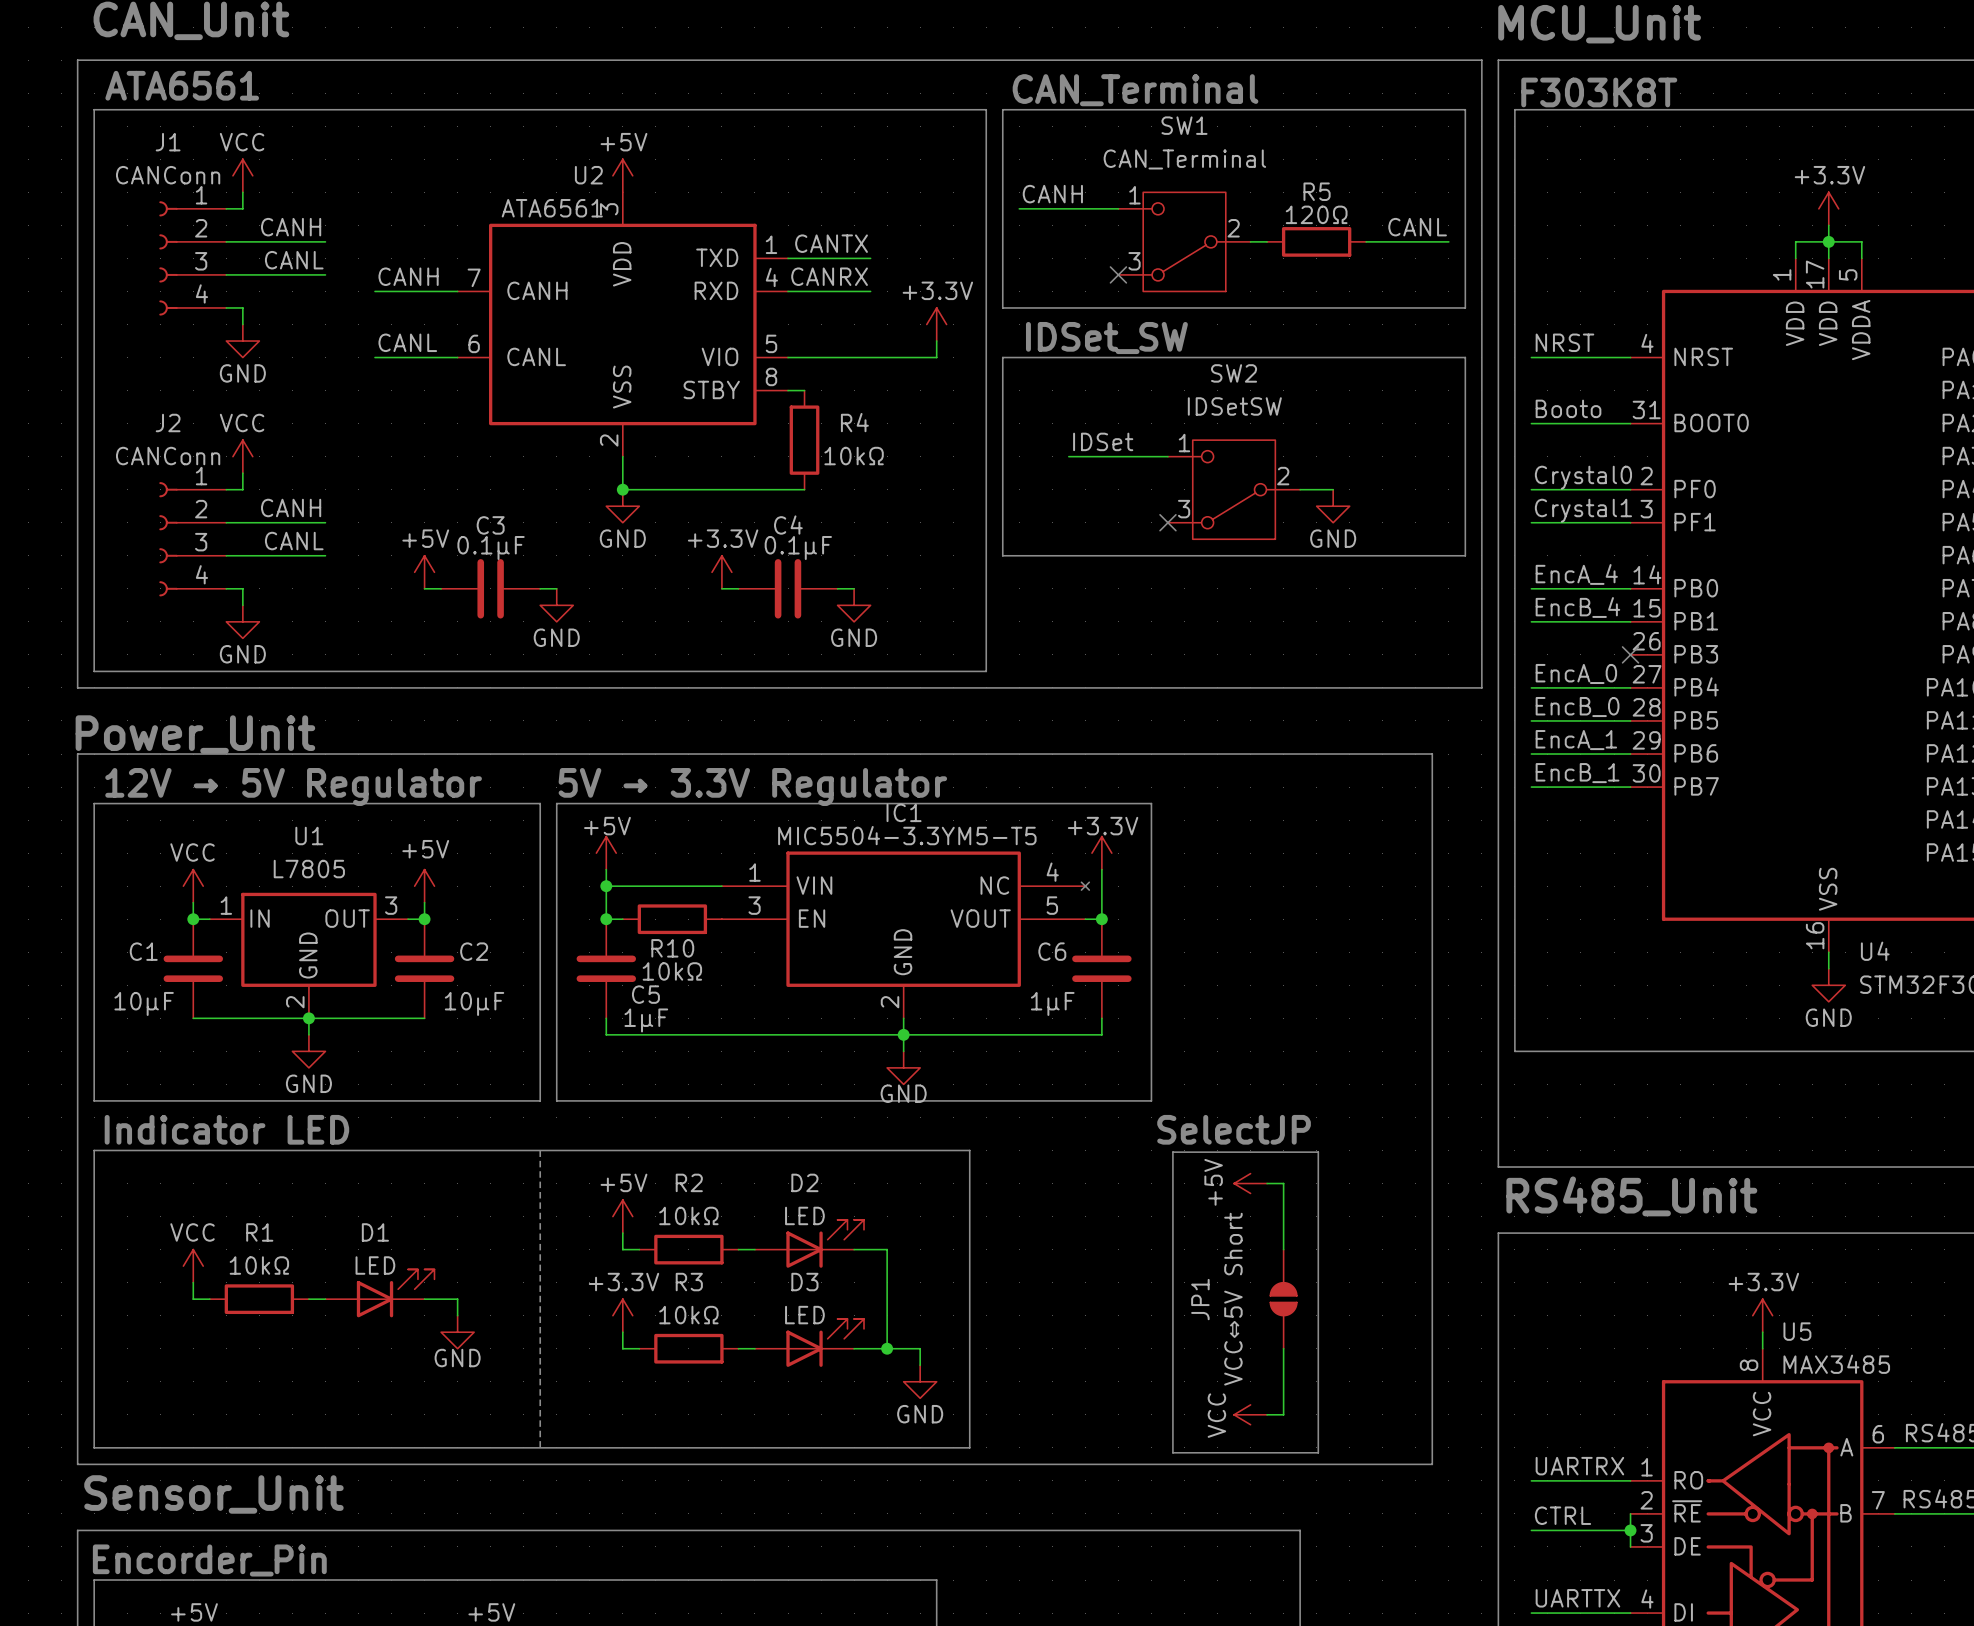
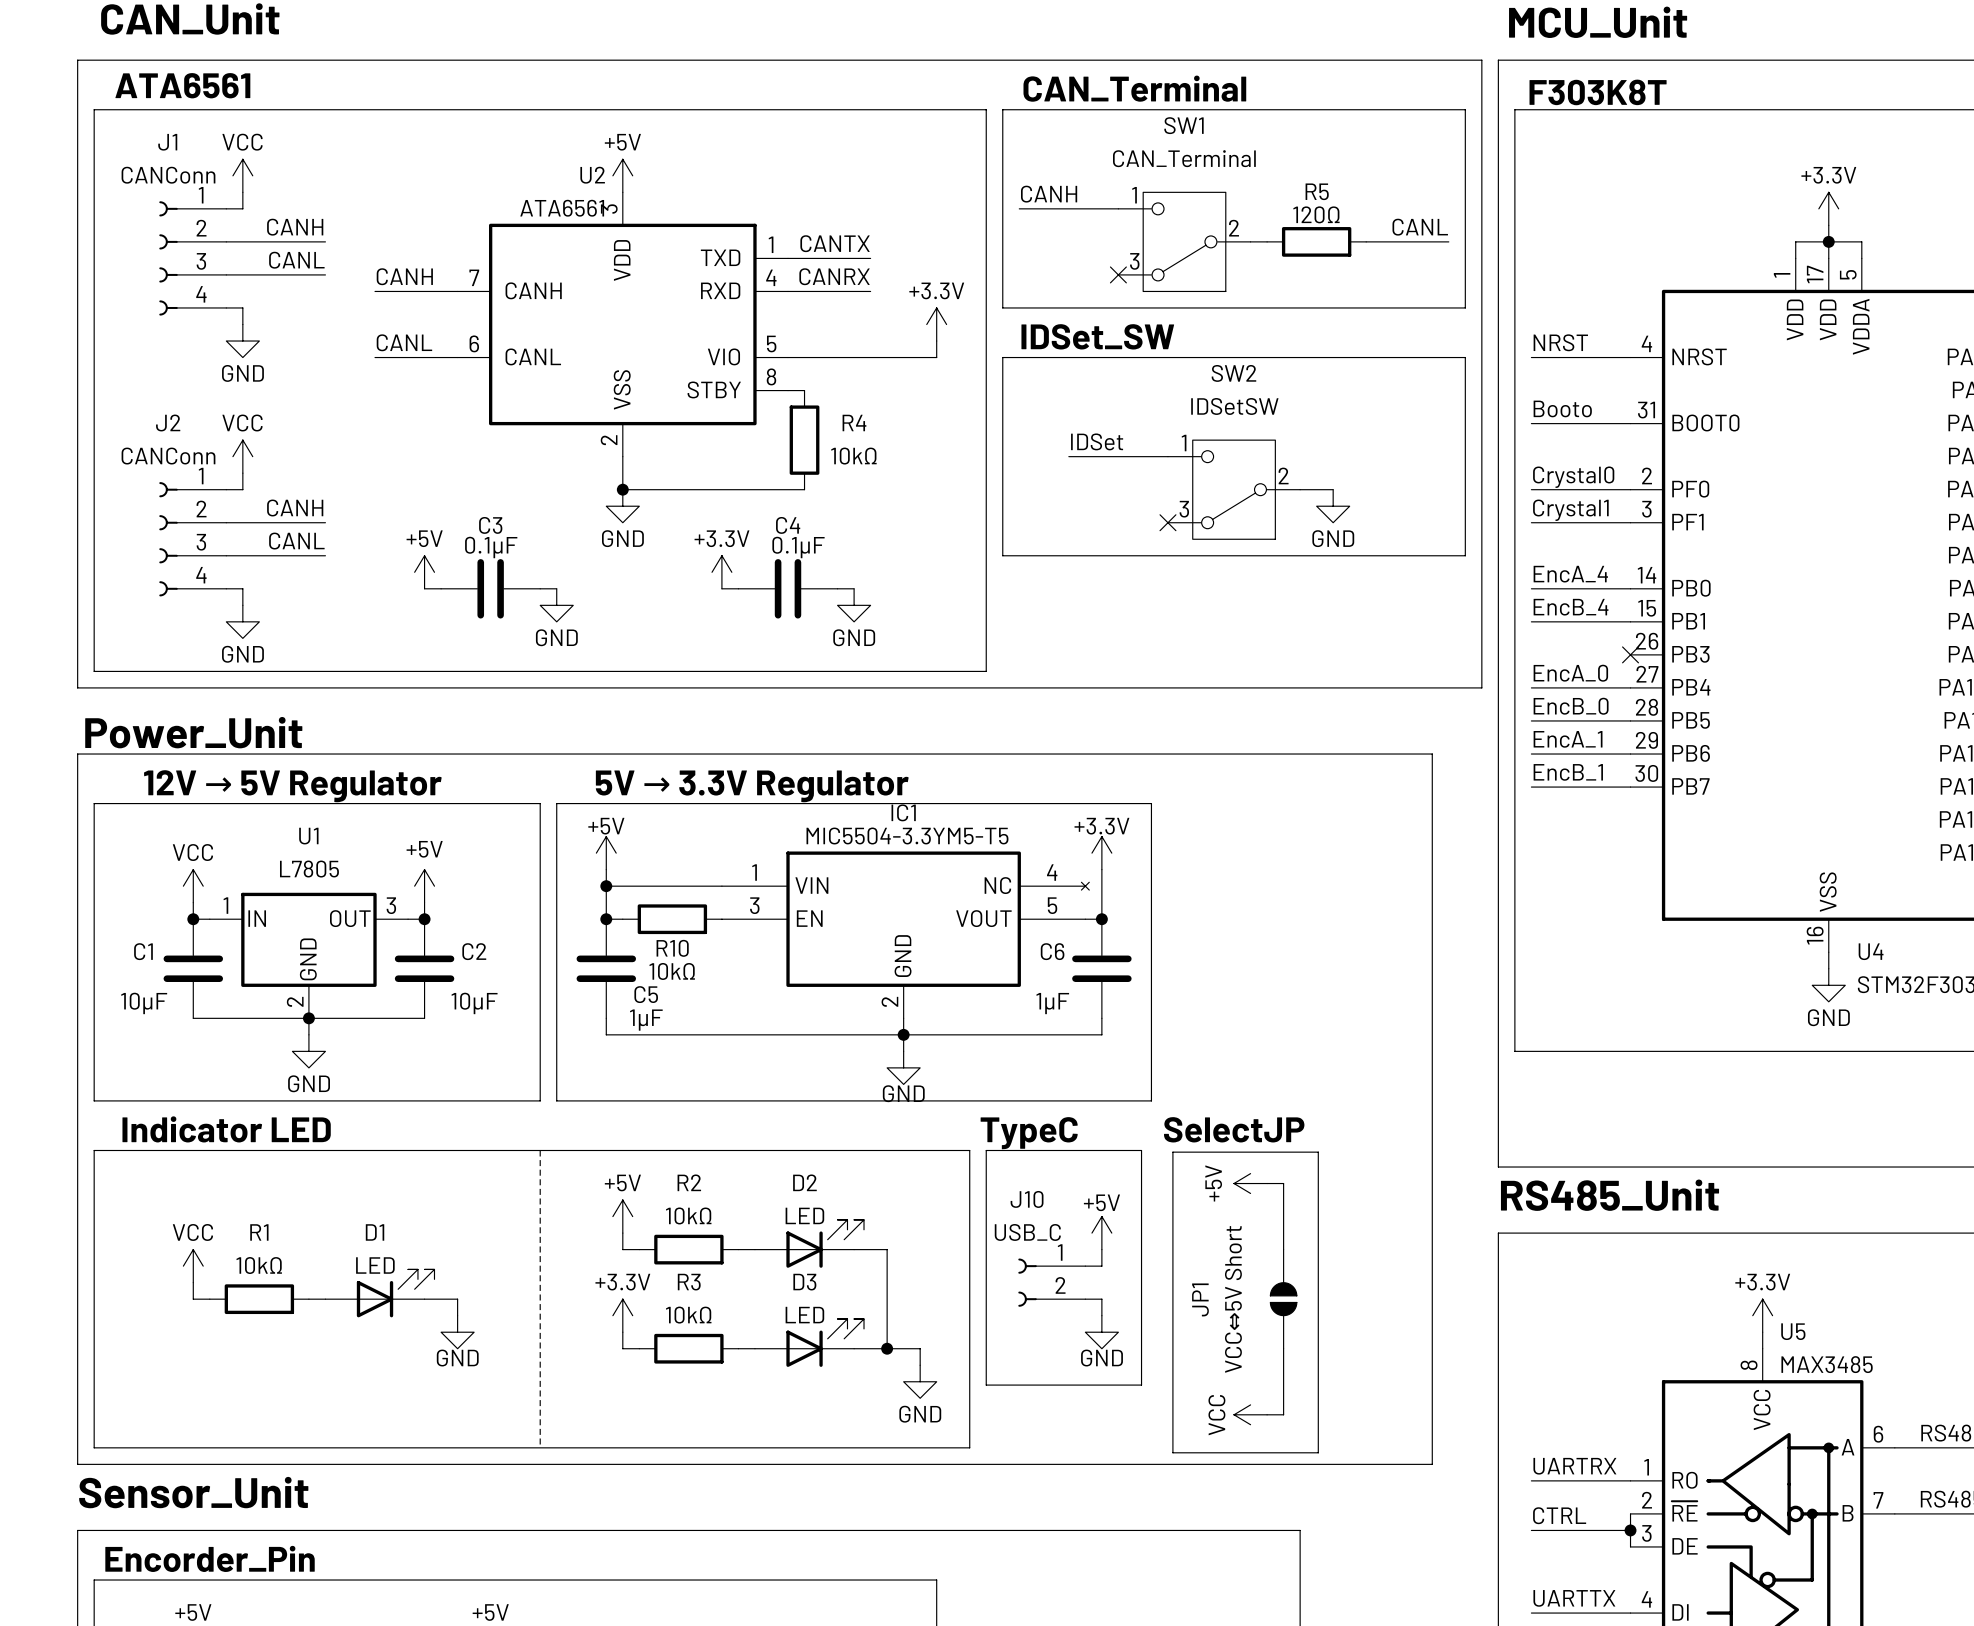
text: none -> TypeC (1029, 1133)
line: none -> (986, 1150) (1141, 1150) (1141, 1385) (986, 1385) (986, 1150)
power symbol: none -> +5V (1101, 1233)
wire: none -> (1101, 1249) (1101, 1266) (1085, 1266)
J10: none -> USB_C (1051, 1282)
wire: none -> (1085, 1299) (1101, 1299) (1101, 1315)
power symbol: none -> GND (1101, 1332)

